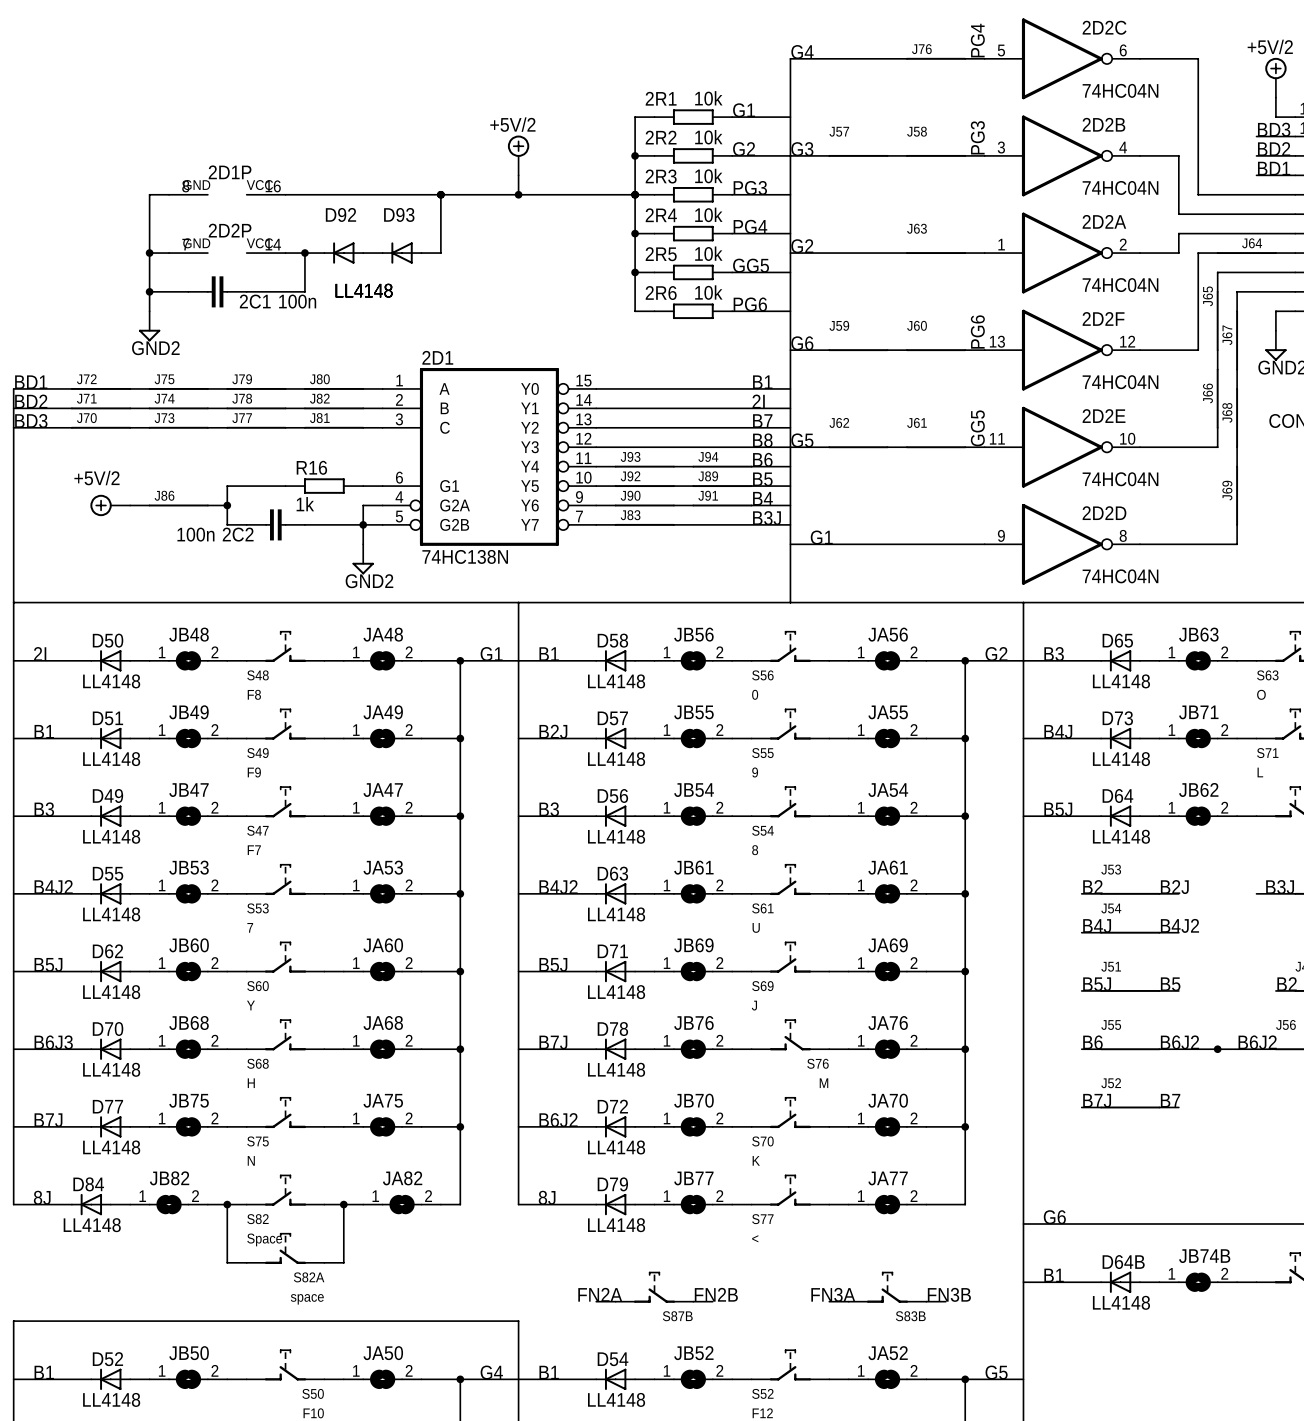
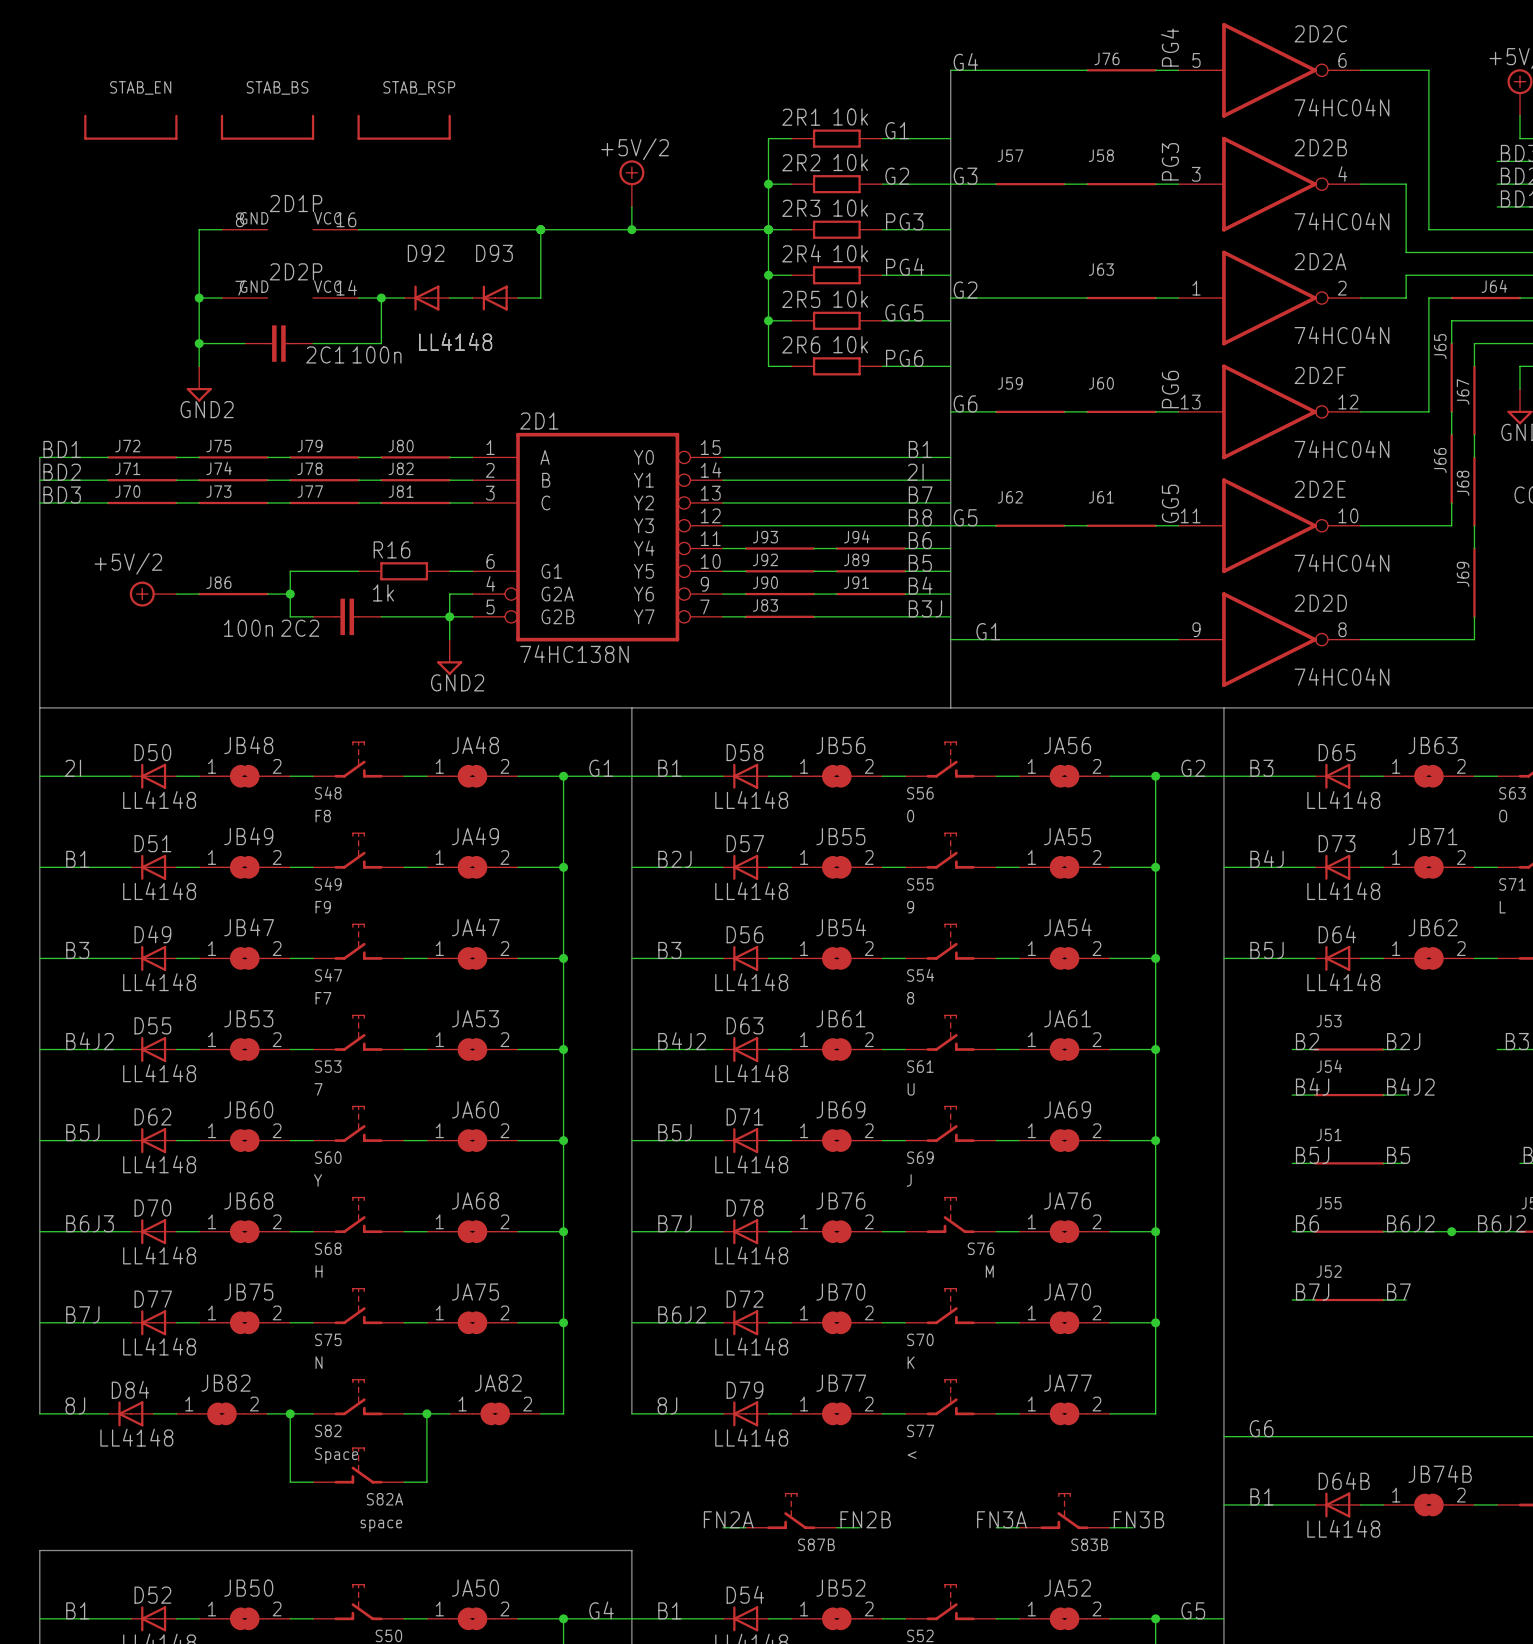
STAB_EN: none -> (130, 127)
STAB_BS: none -> (267, 127)
STAB_RSP: none -> (404, 127)

